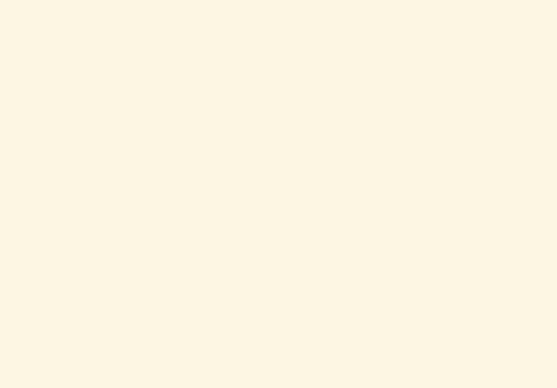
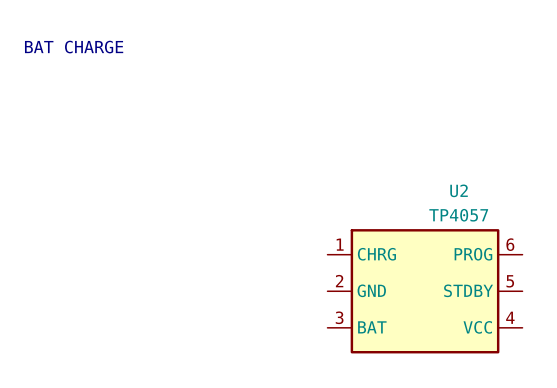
text: none -> BAT CHARGE (74, 47)
U2: none -> TP4057 (425, 291)

